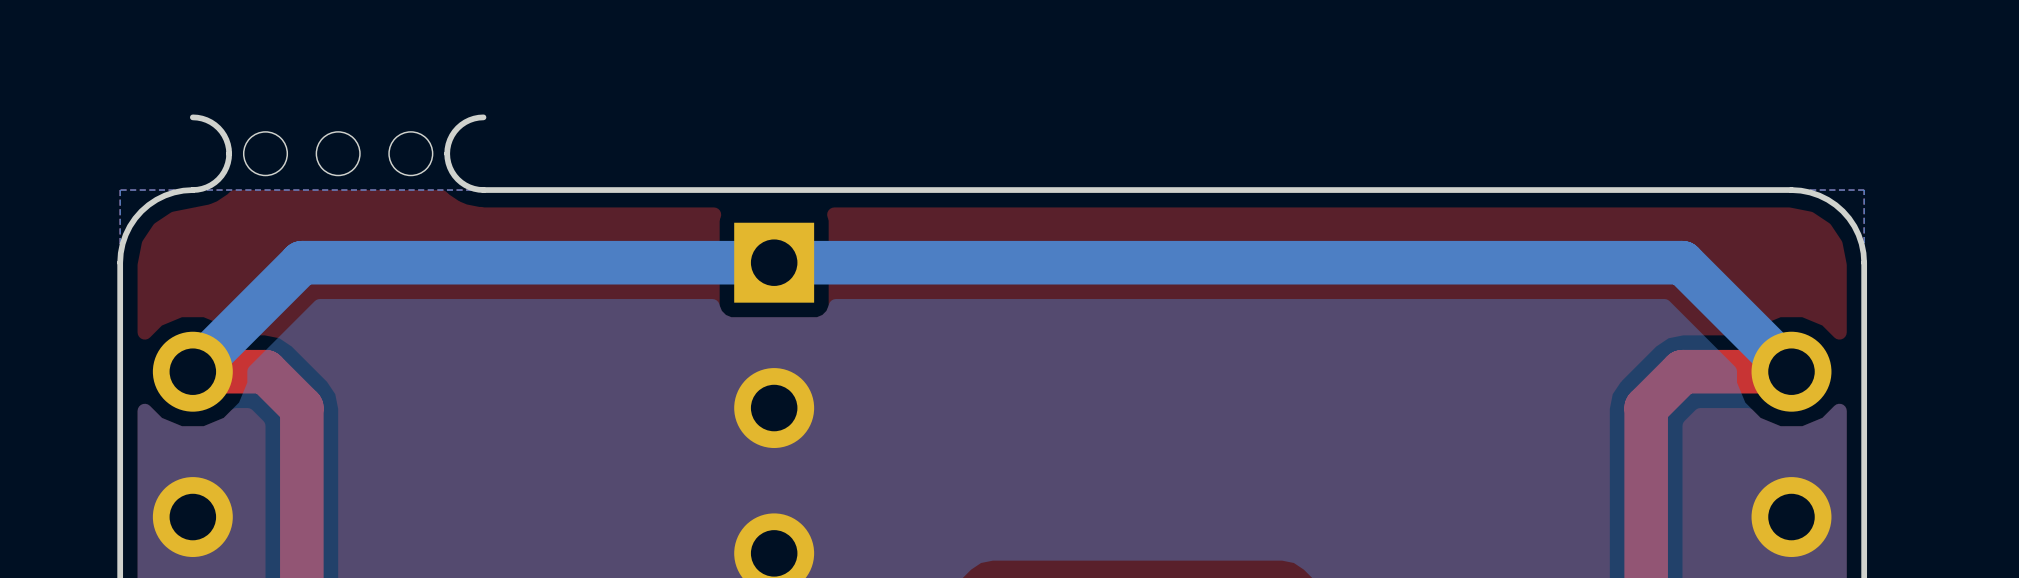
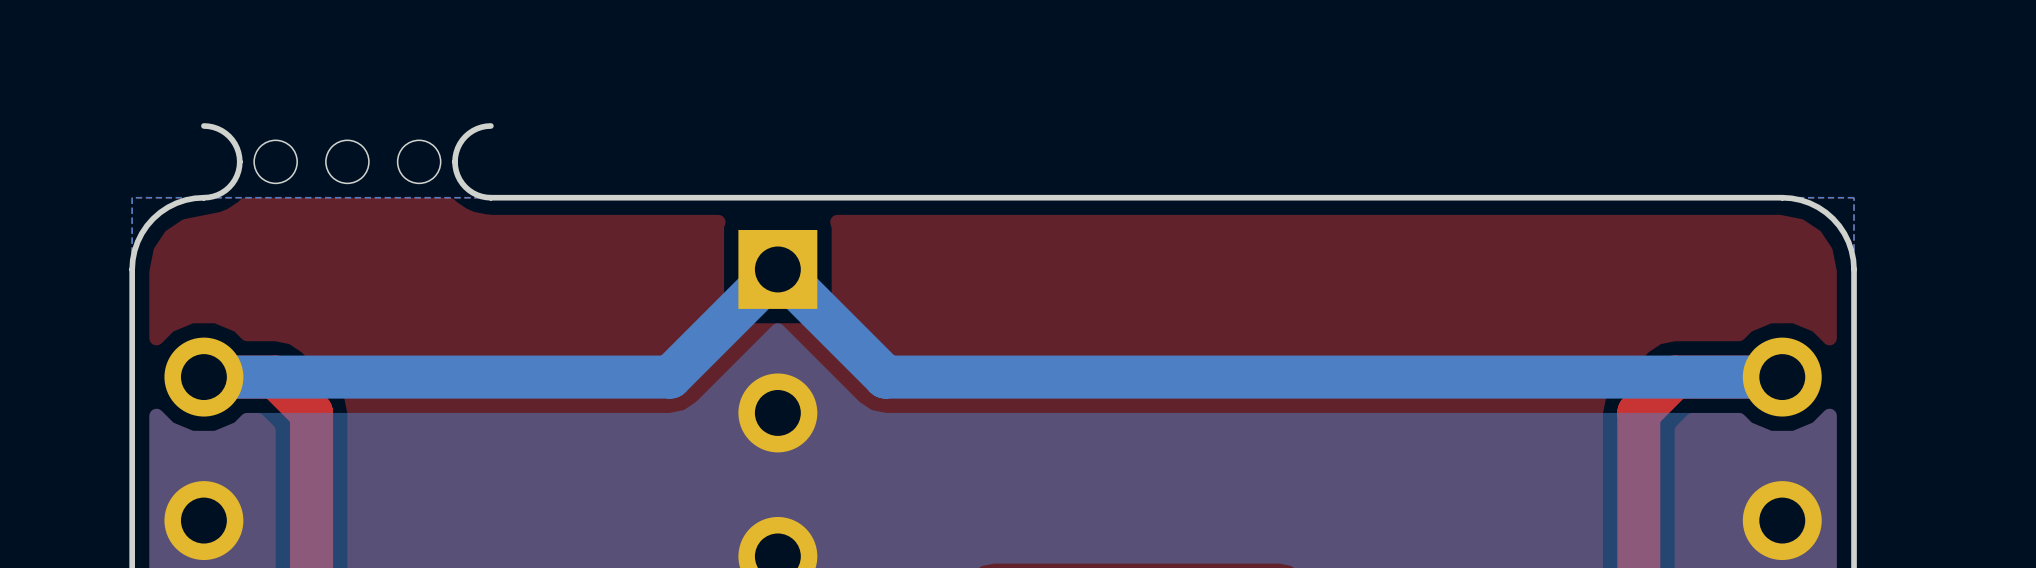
bottom track: (1791, 371) (1682, 262) (301, 262) (192, 371) -> (1782, 377) (885, 377) (777, 269) (670, 377) (203, 377)

